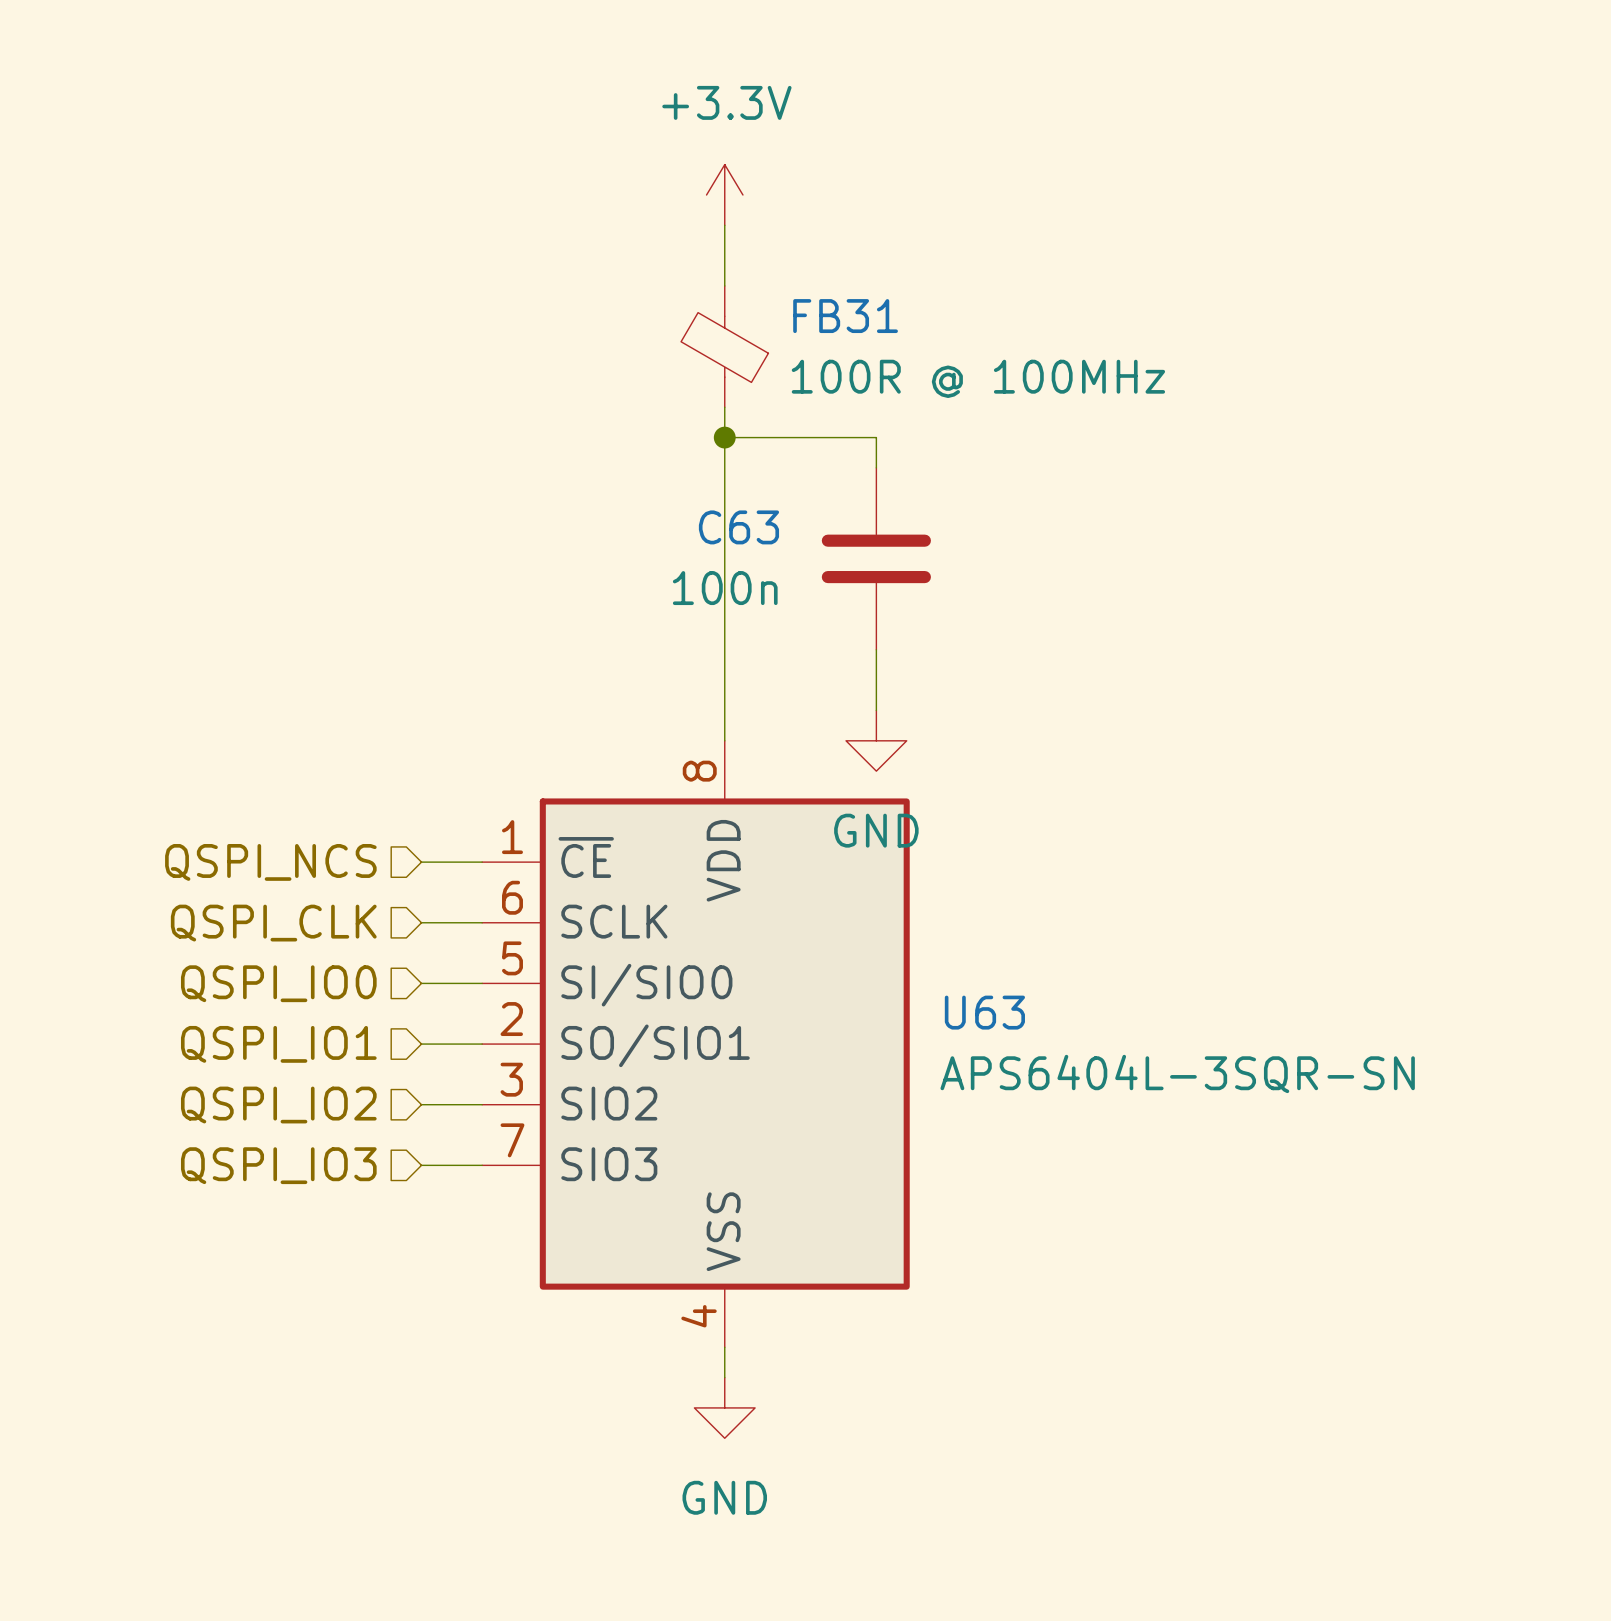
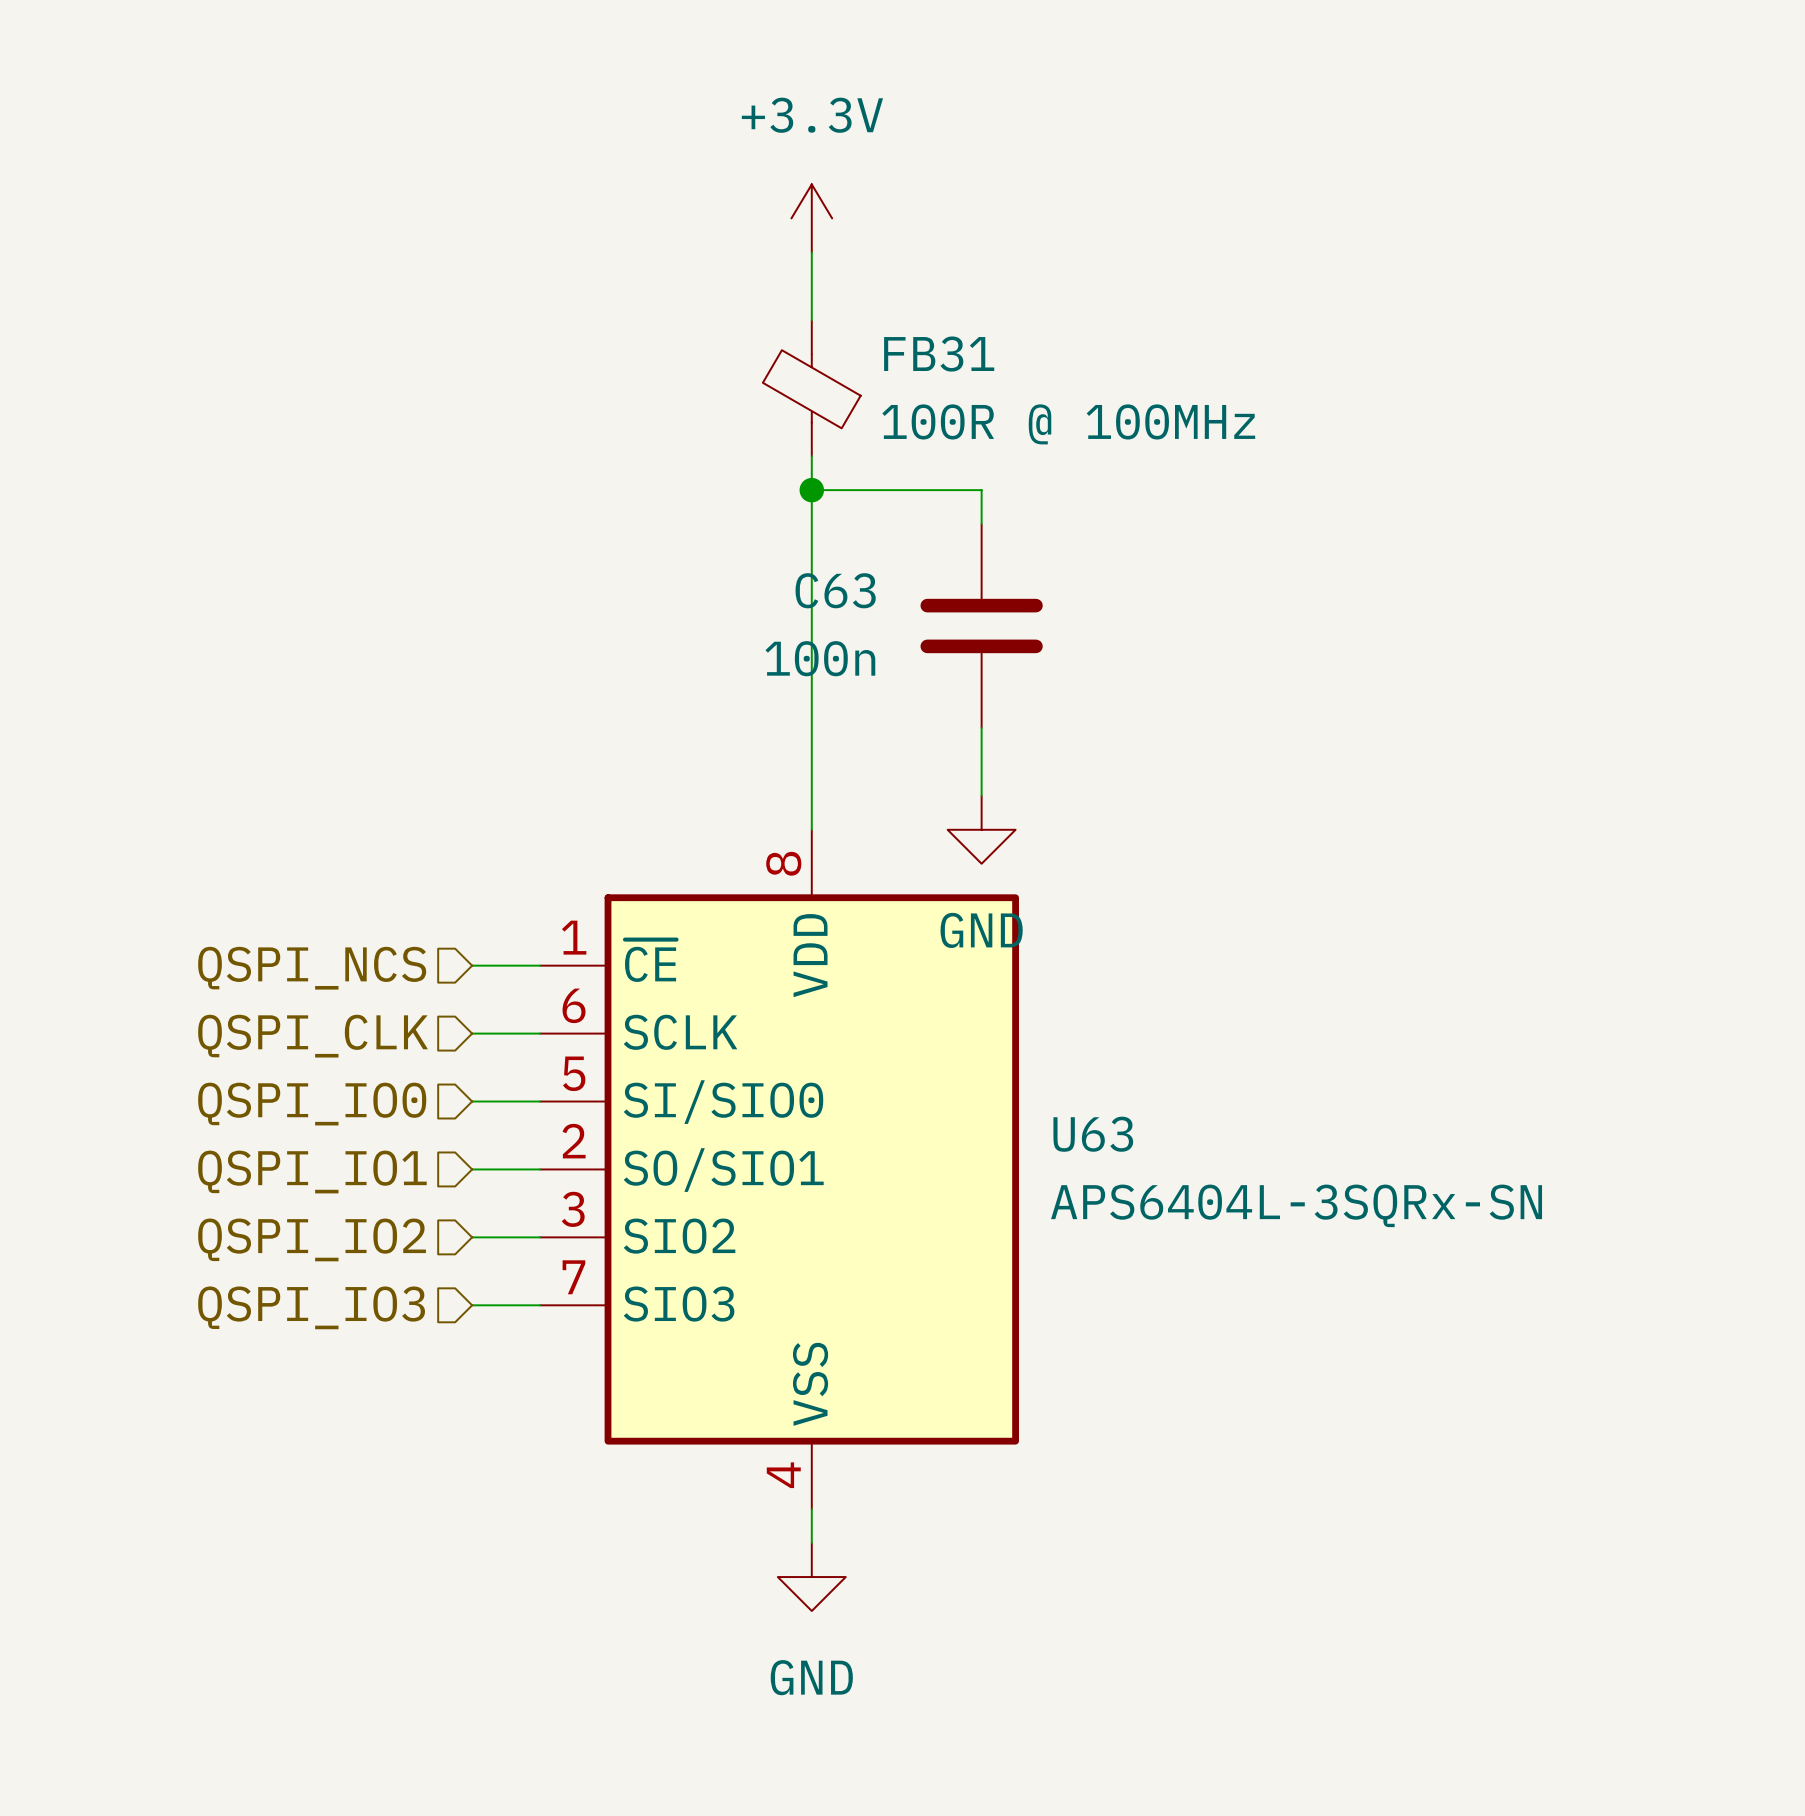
U63 value: APS6404L-3SQR-SN (1177, 1073) -> APS6404L-3SQRx-SN (1296, 1205)

